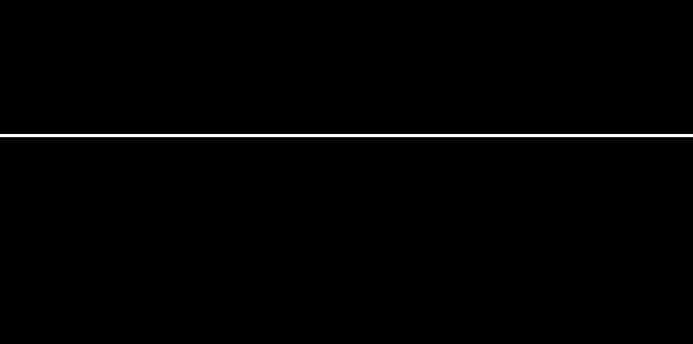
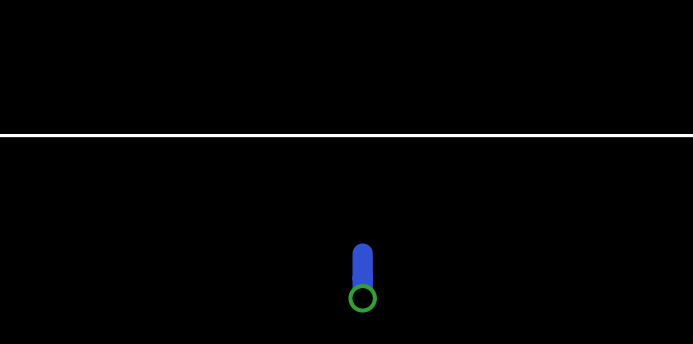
track: none -> (362, 253) (362, 298)
via: none -> (362, 298)

